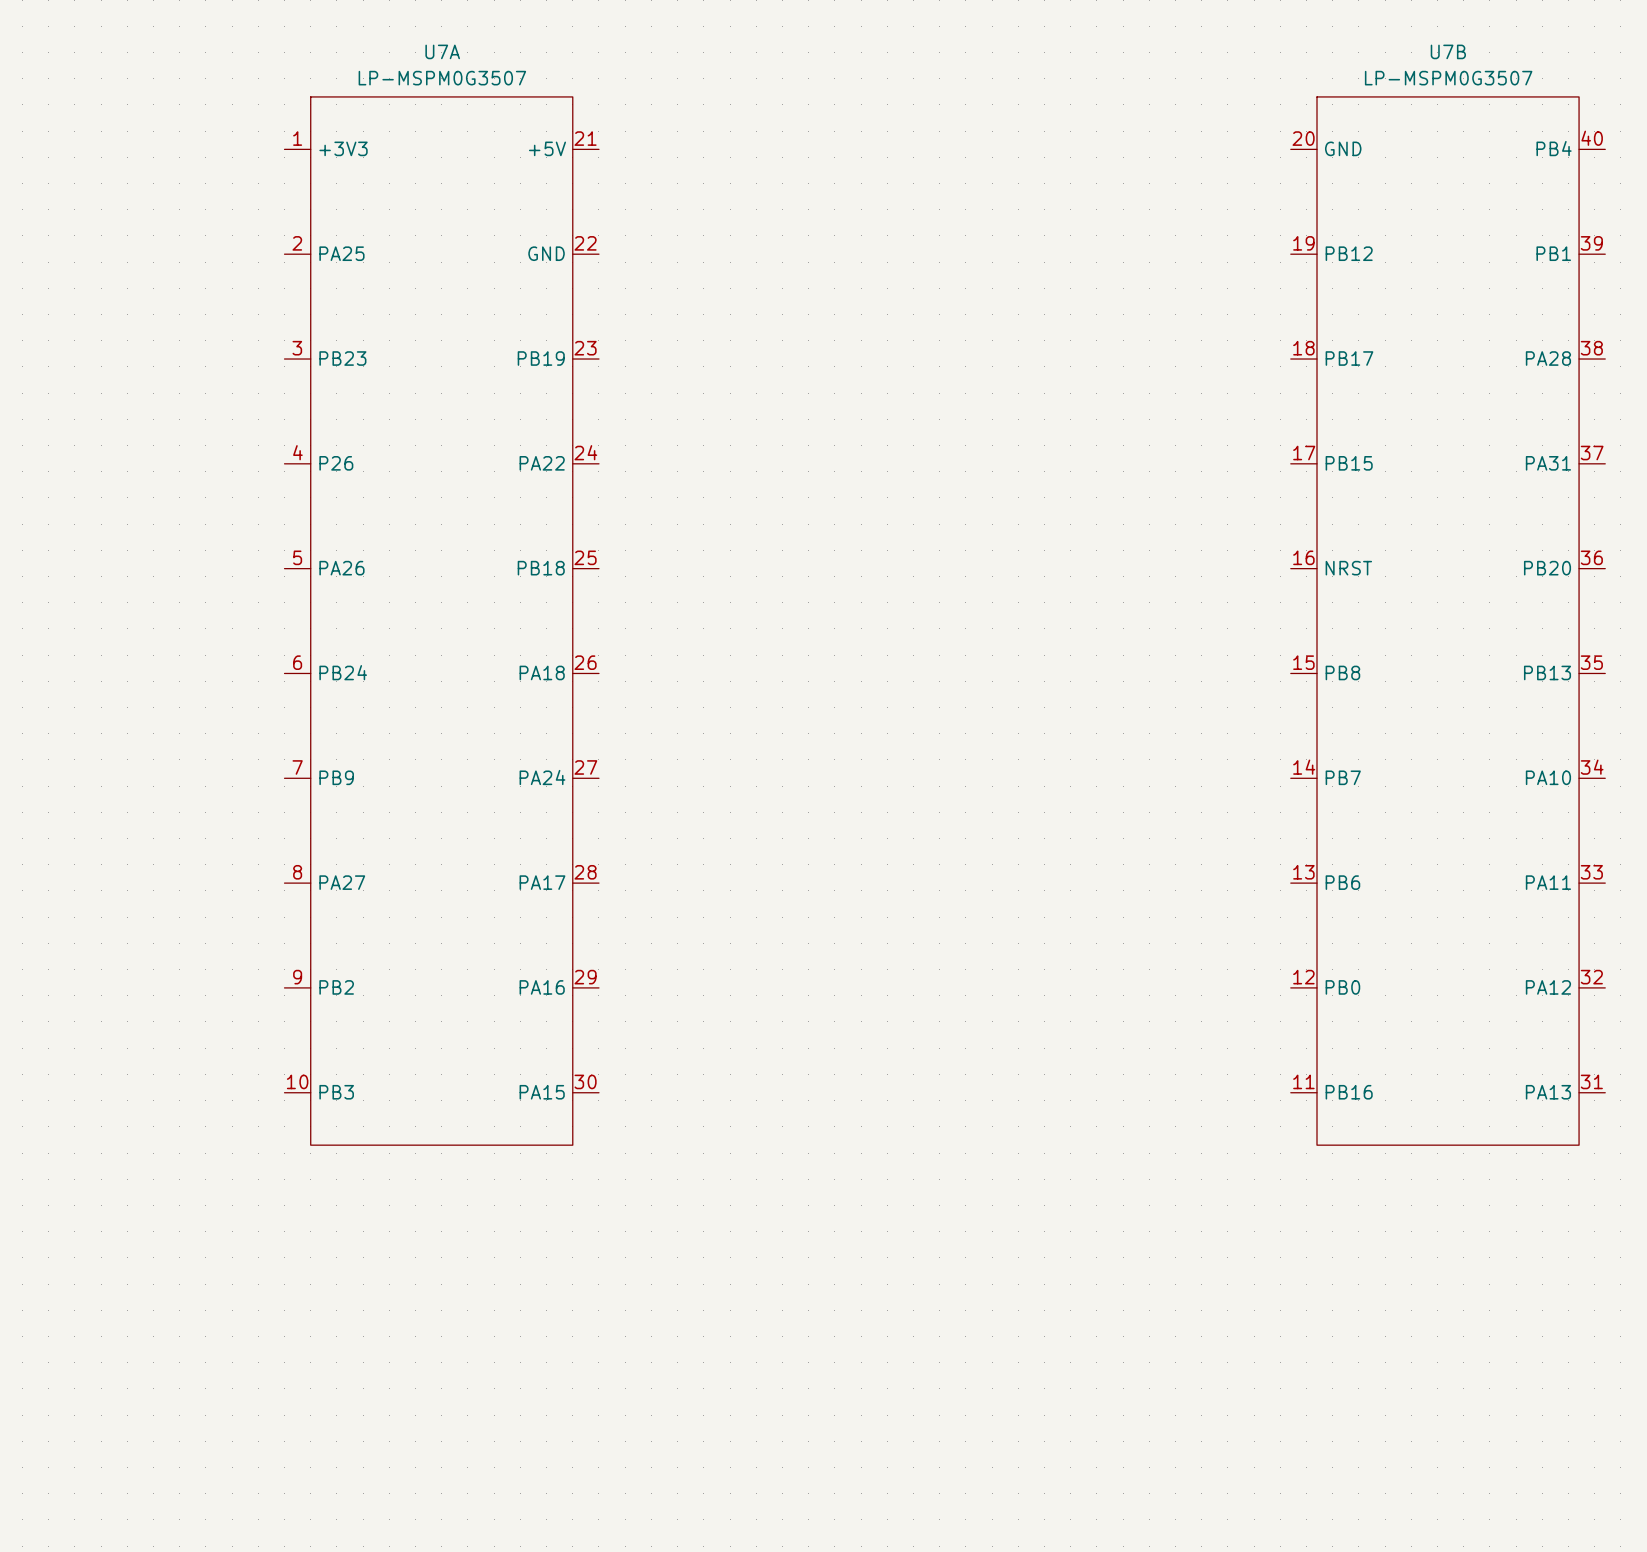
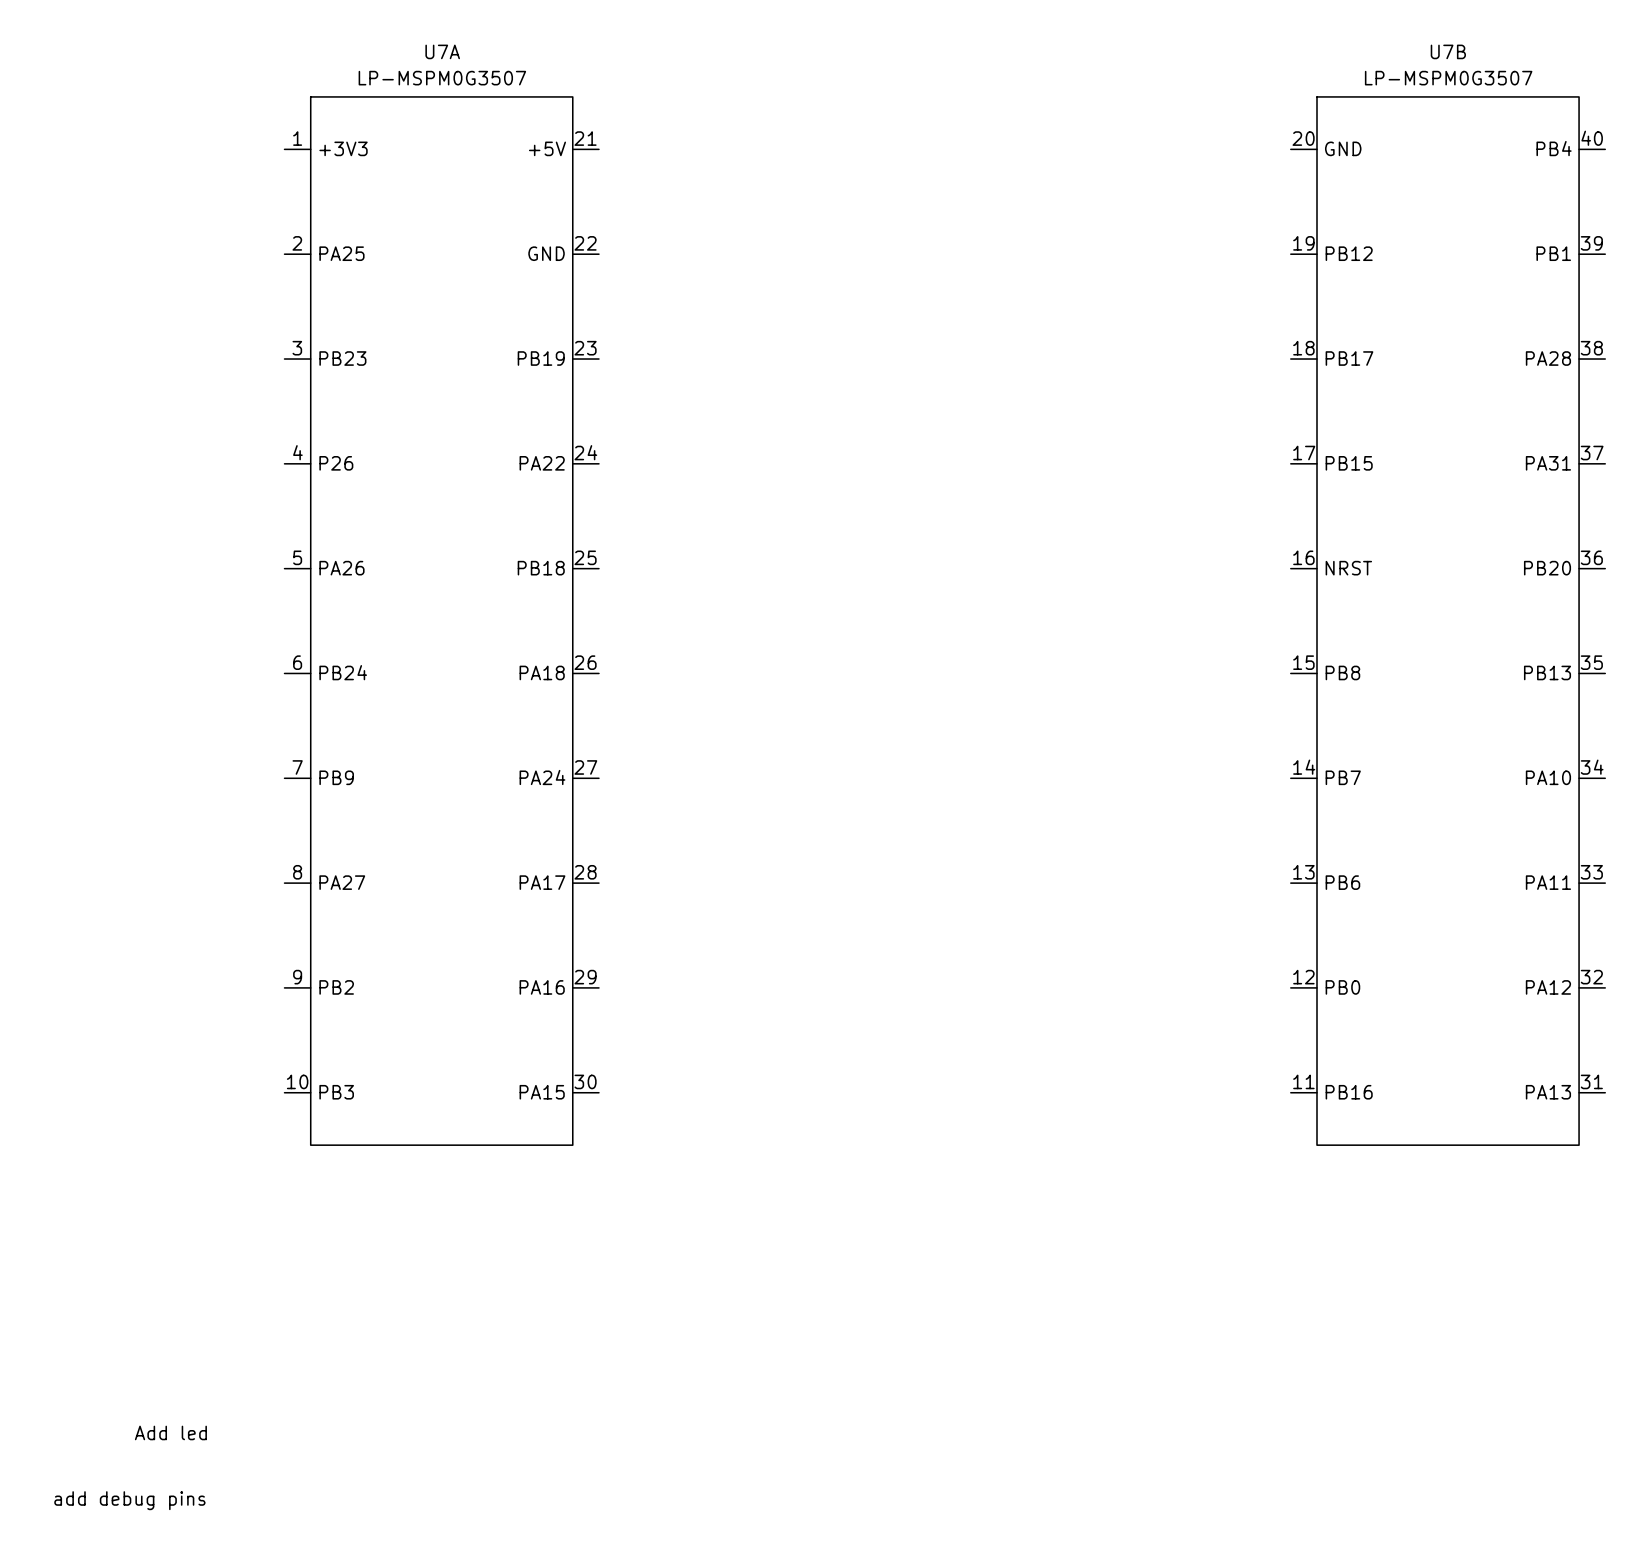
text: none -> Add led (170, 1432)
text: none -> add debug pins (129, 1500)

